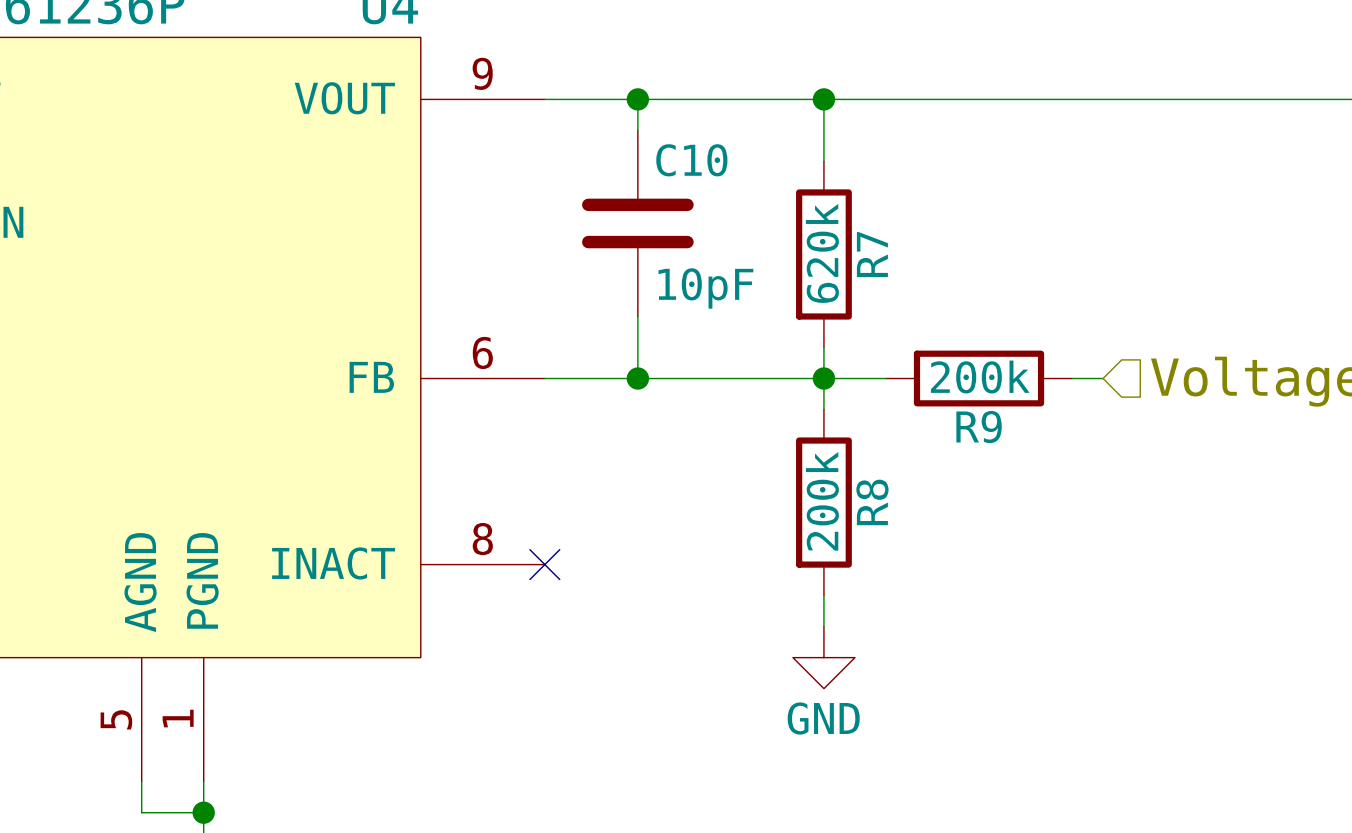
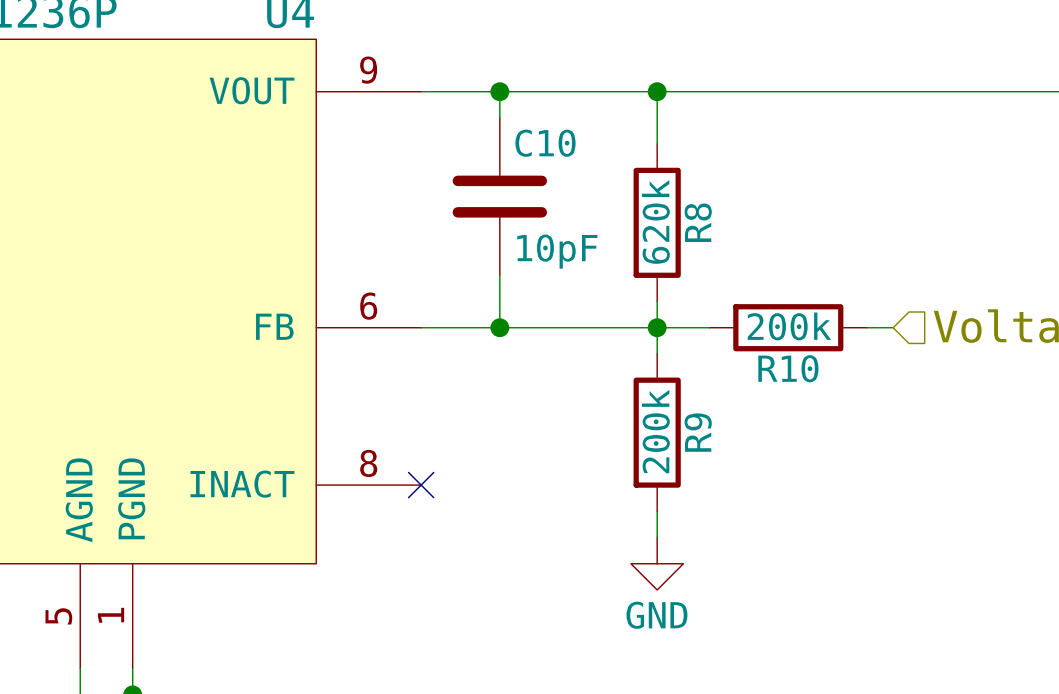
R7 name: R7 (872, 254) -> R8 (698, 222)
R9 name: R9 (979, 427) -> R10 (788, 368)
R8 name: R8 (872, 502) -> R9 (698, 432)

